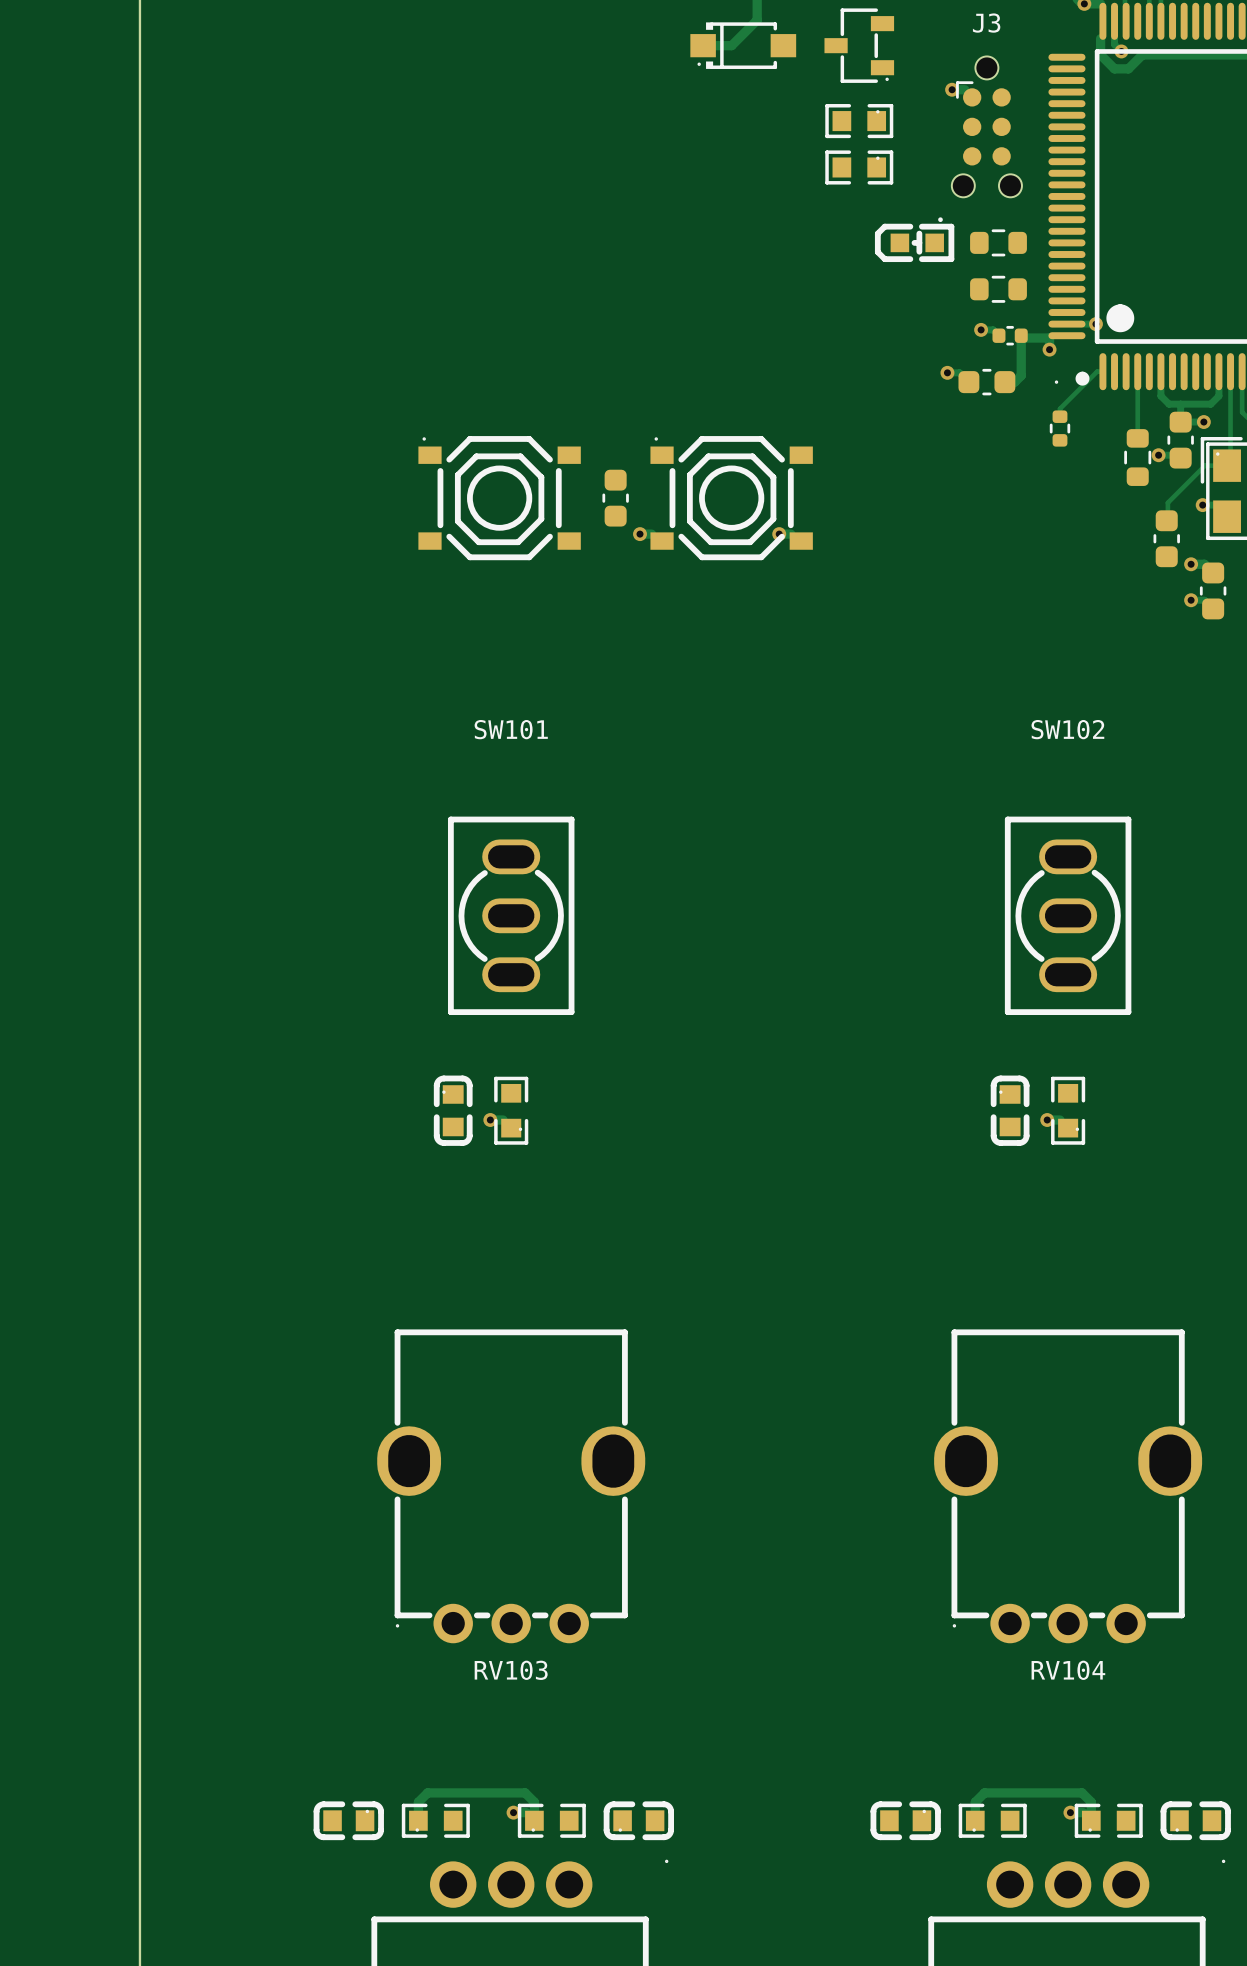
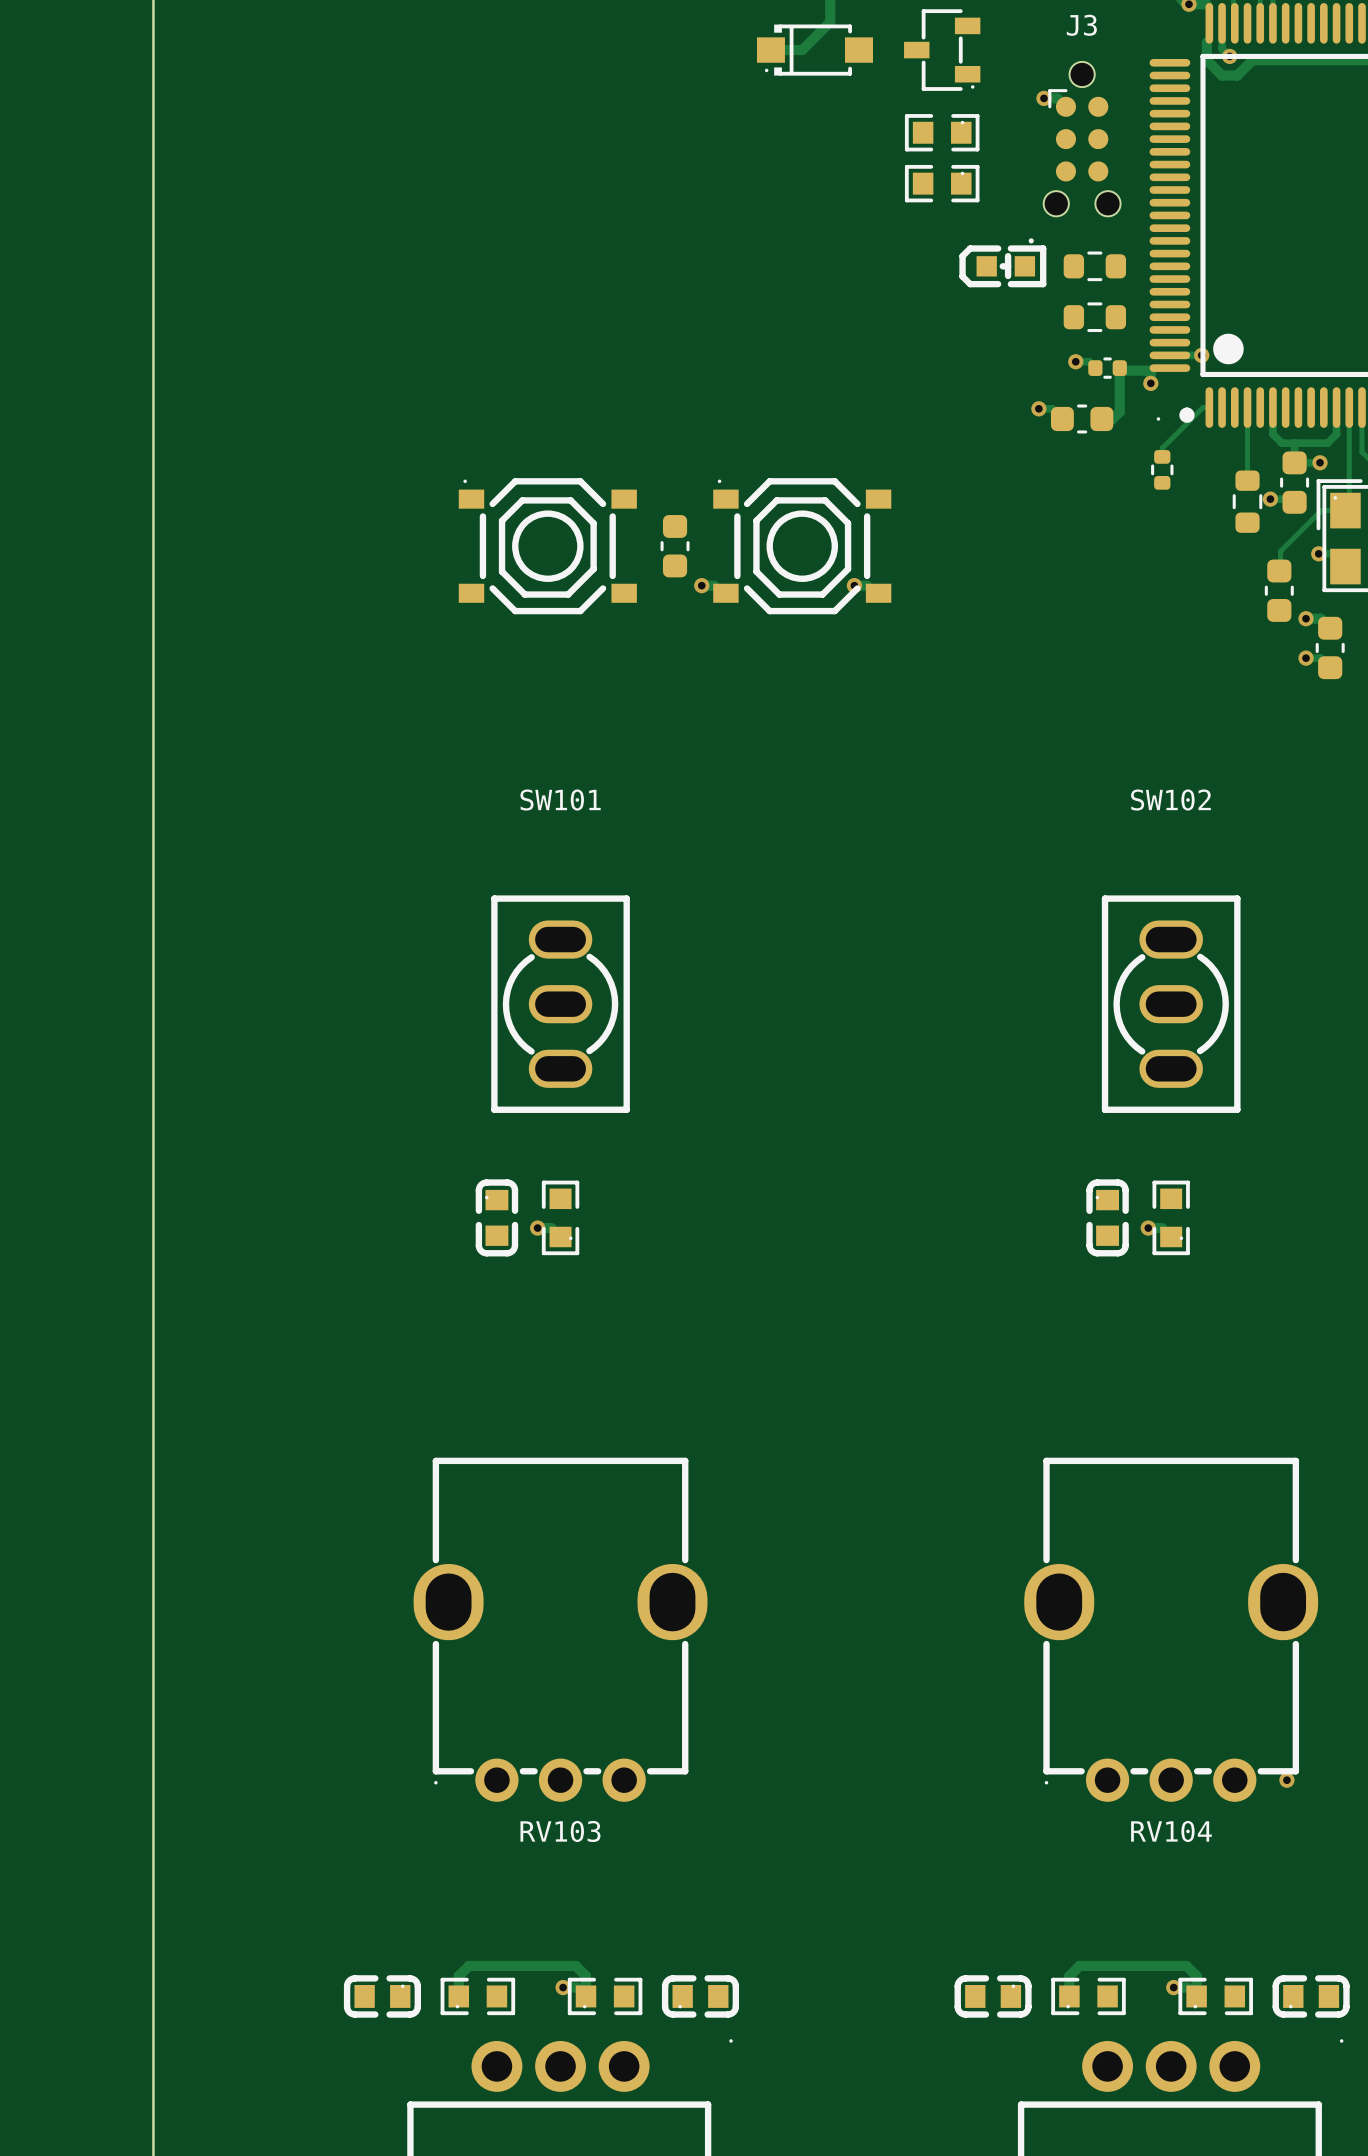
via: none -> (1286, 1780)

